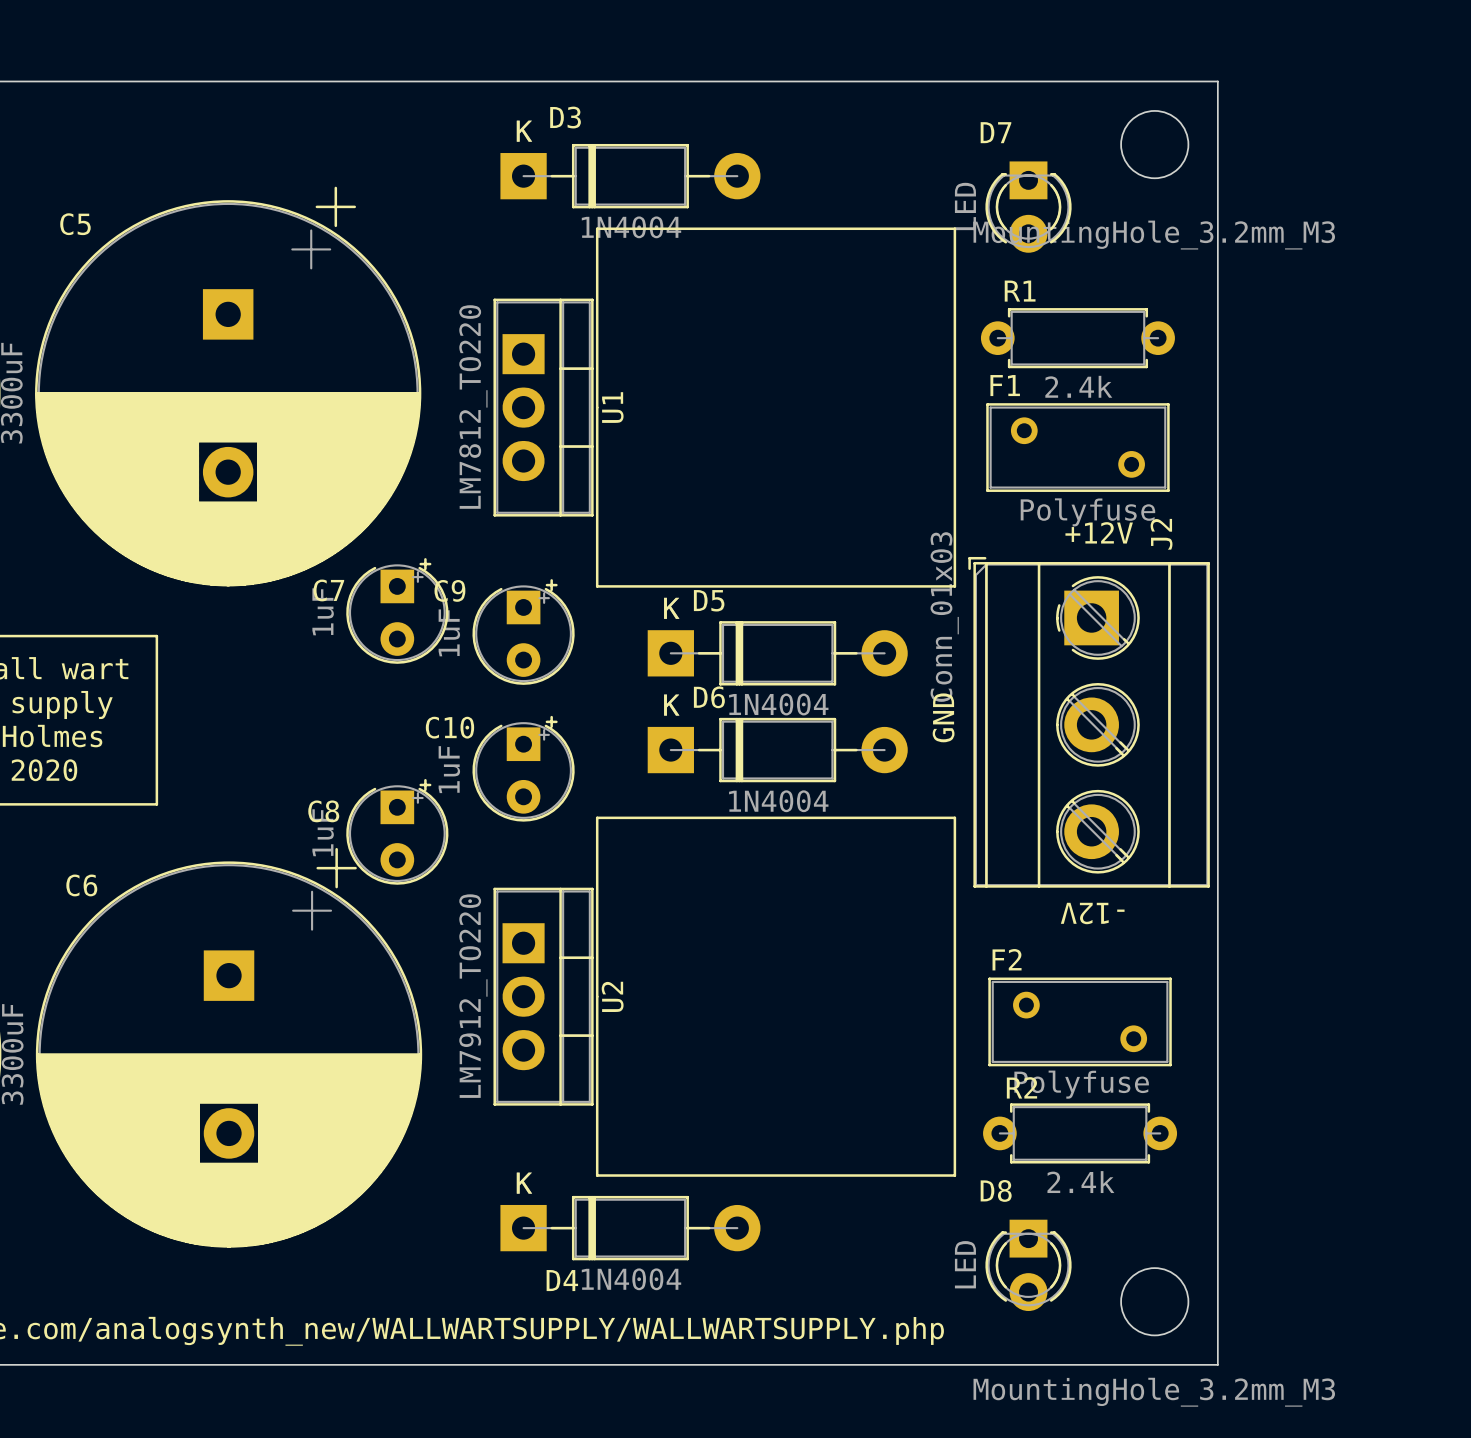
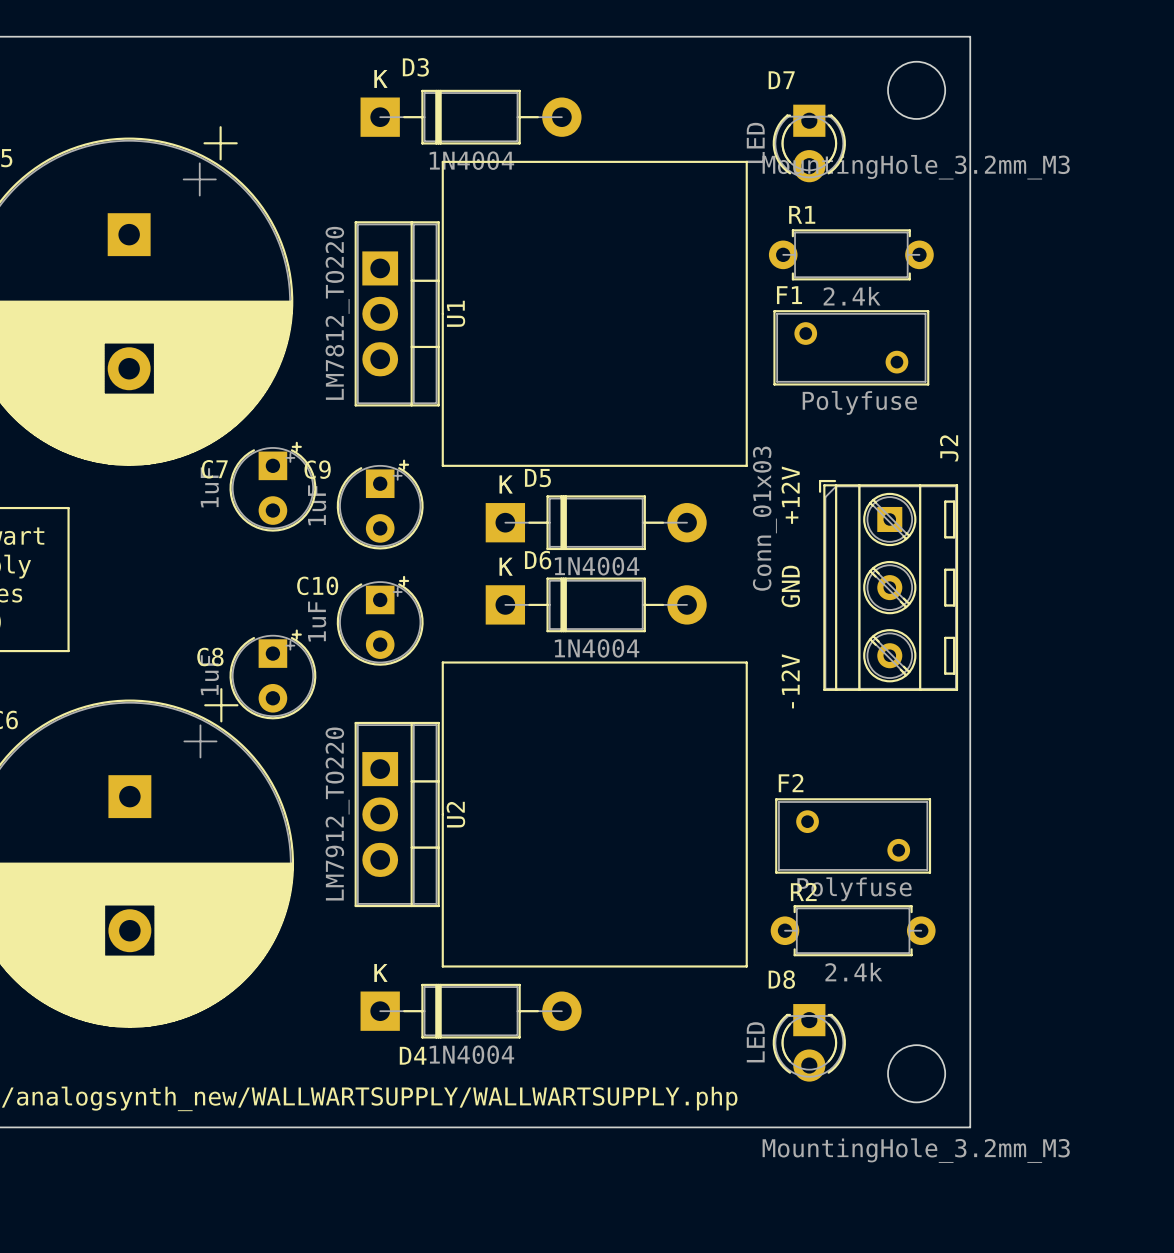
text rotation: 0° (1099, 532) -> 90° counterclockwise (790, 495)
text position: +12V (1099, 532) -> +12V (790, 495)
J2 footprint: [968, 556, 1210, 888] -> [818, 479, 959, 691]
text position: GND (943, 717) -> GND (790, 586)
text rotation: 0° (1092, 913) -> 90° clockwise (790, 681)
text position: -12V (1092, 913) -> -12V (790, 681)

